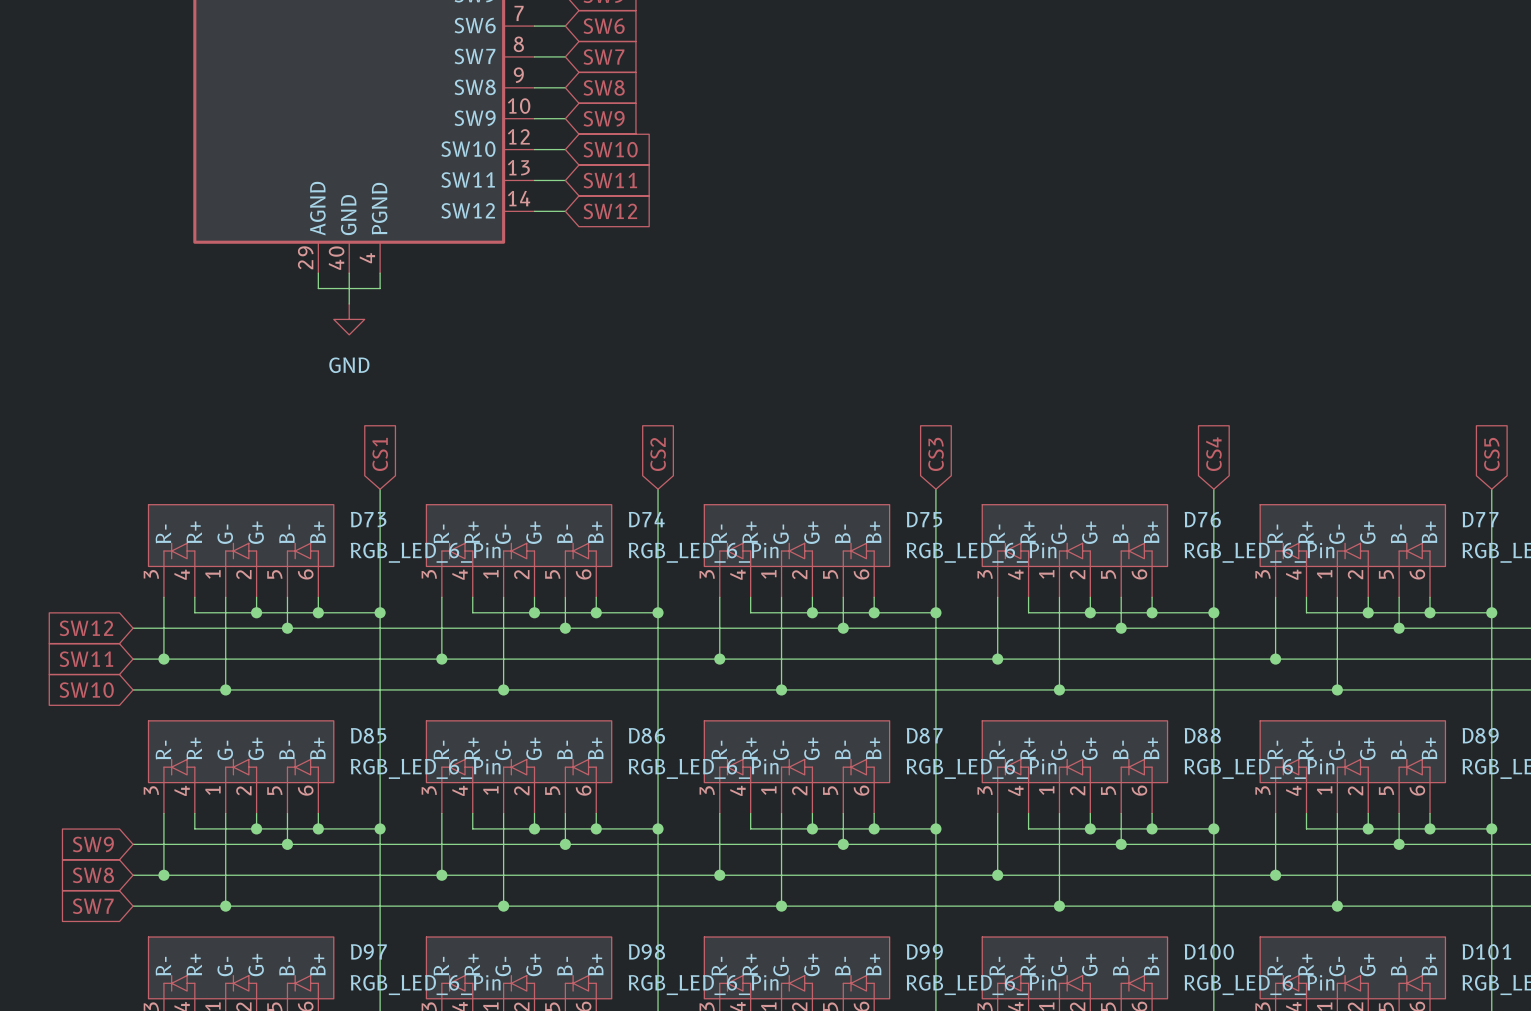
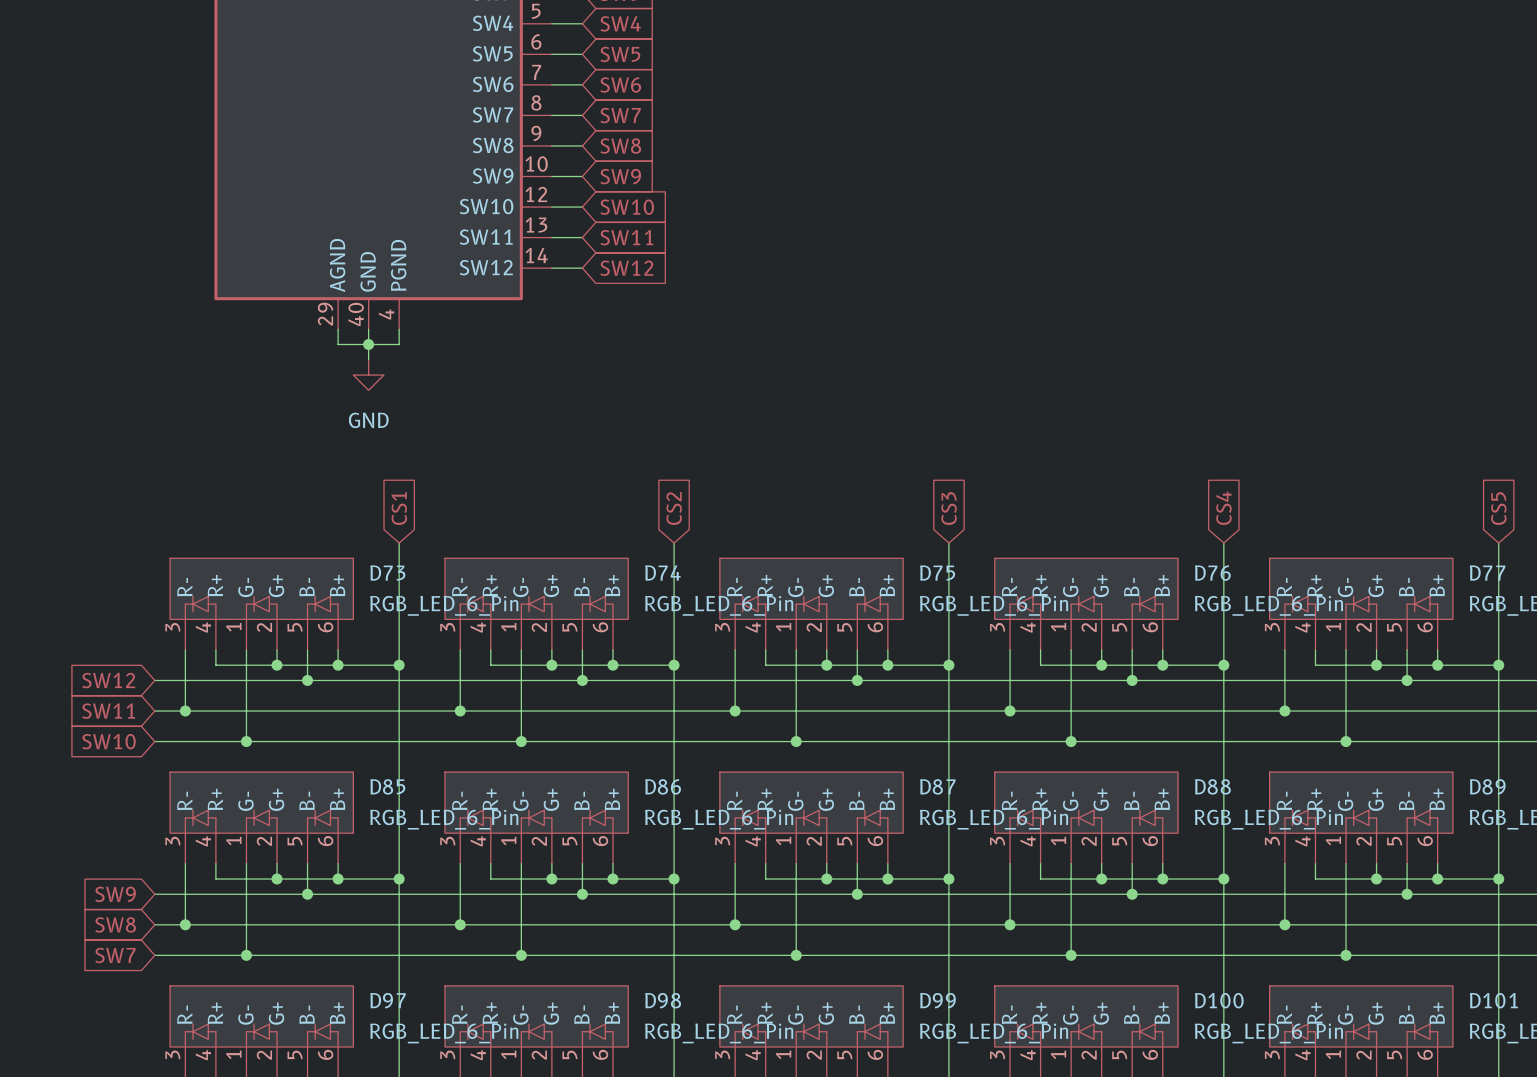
junction: none -> (368, 344)

